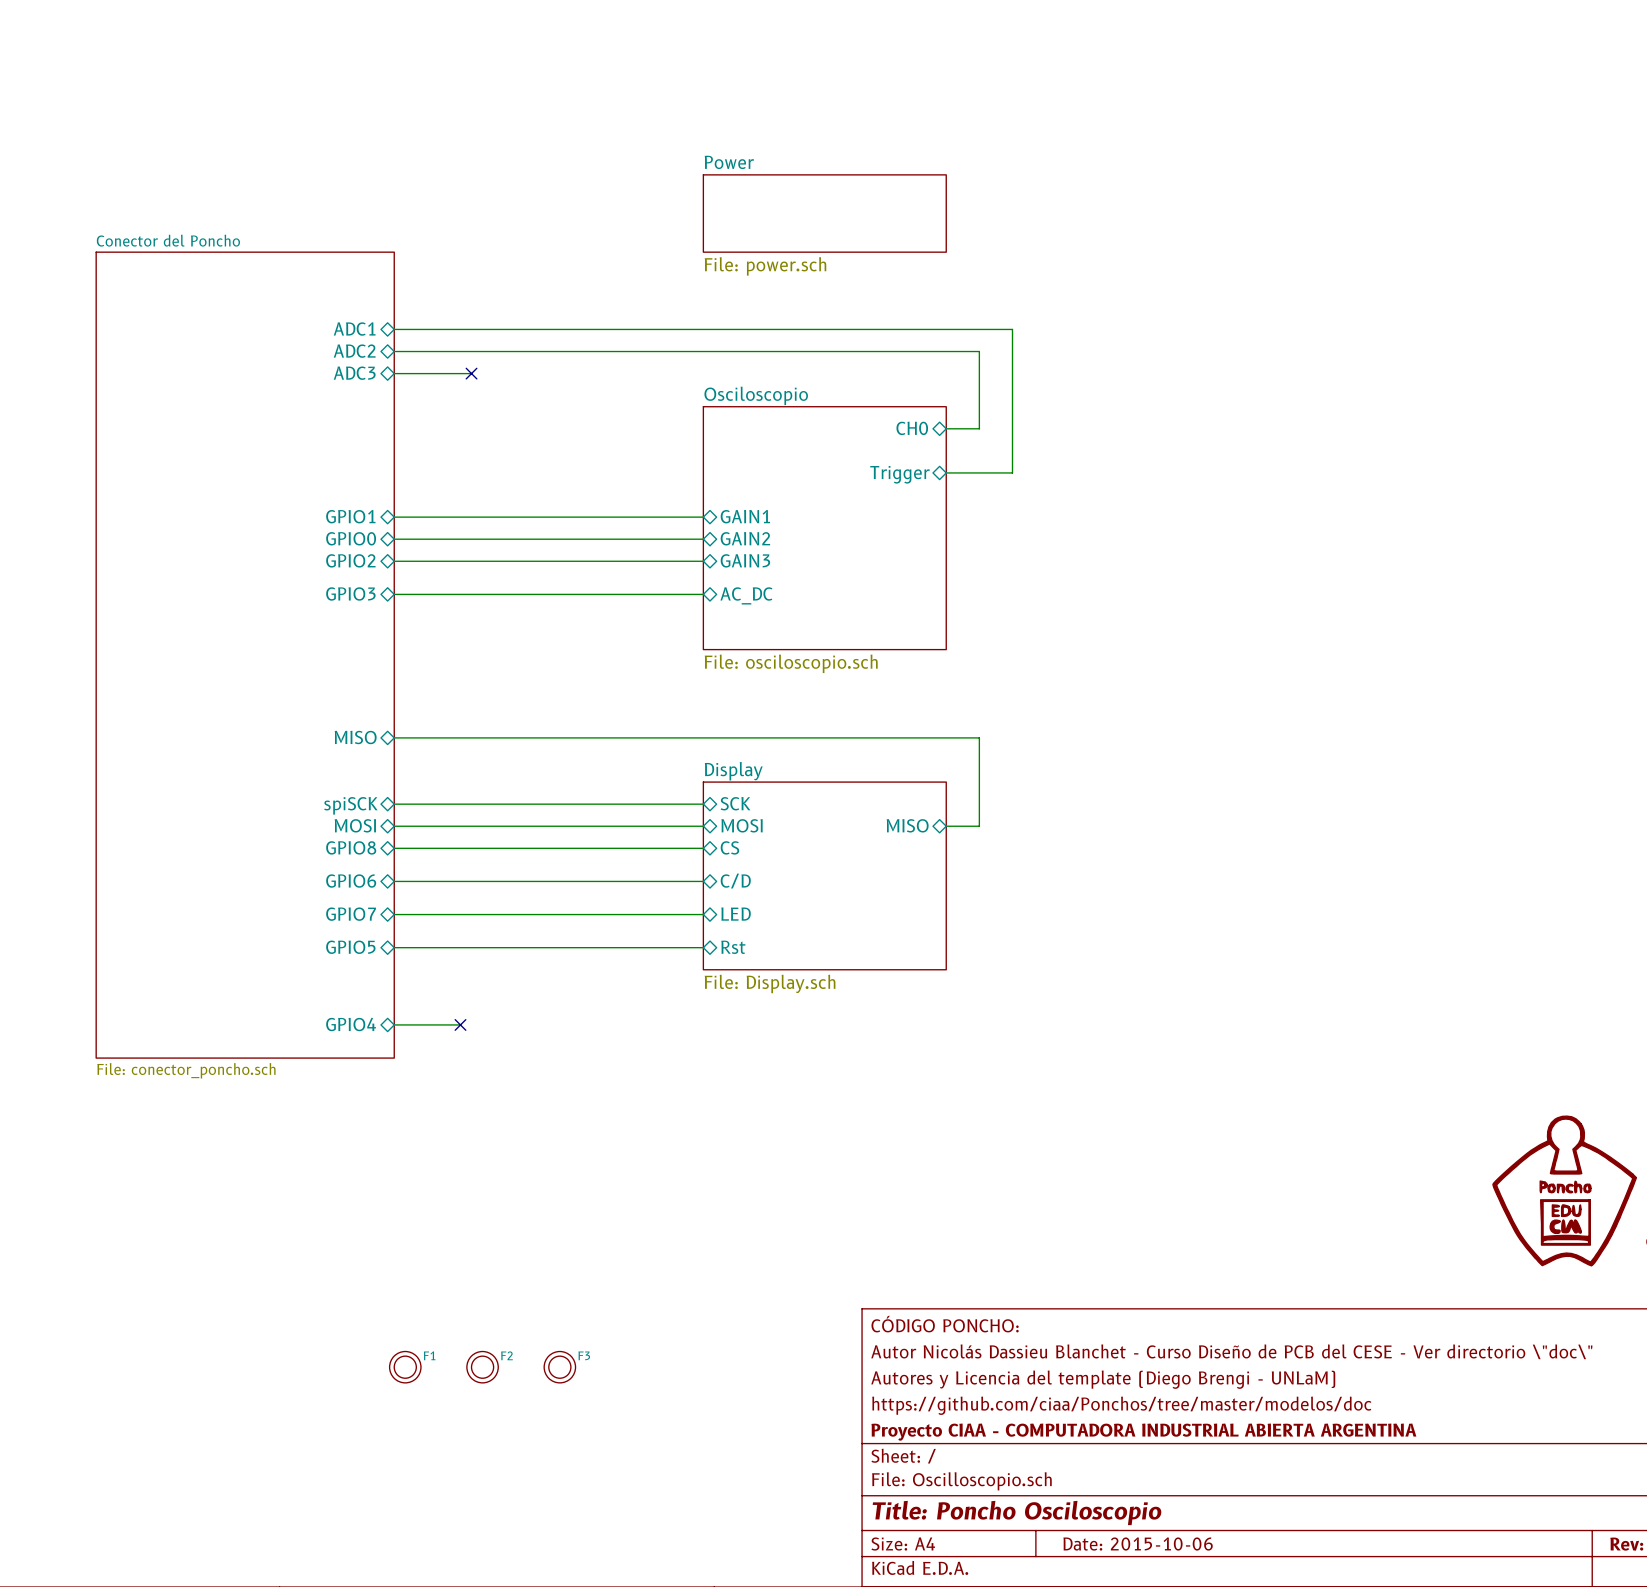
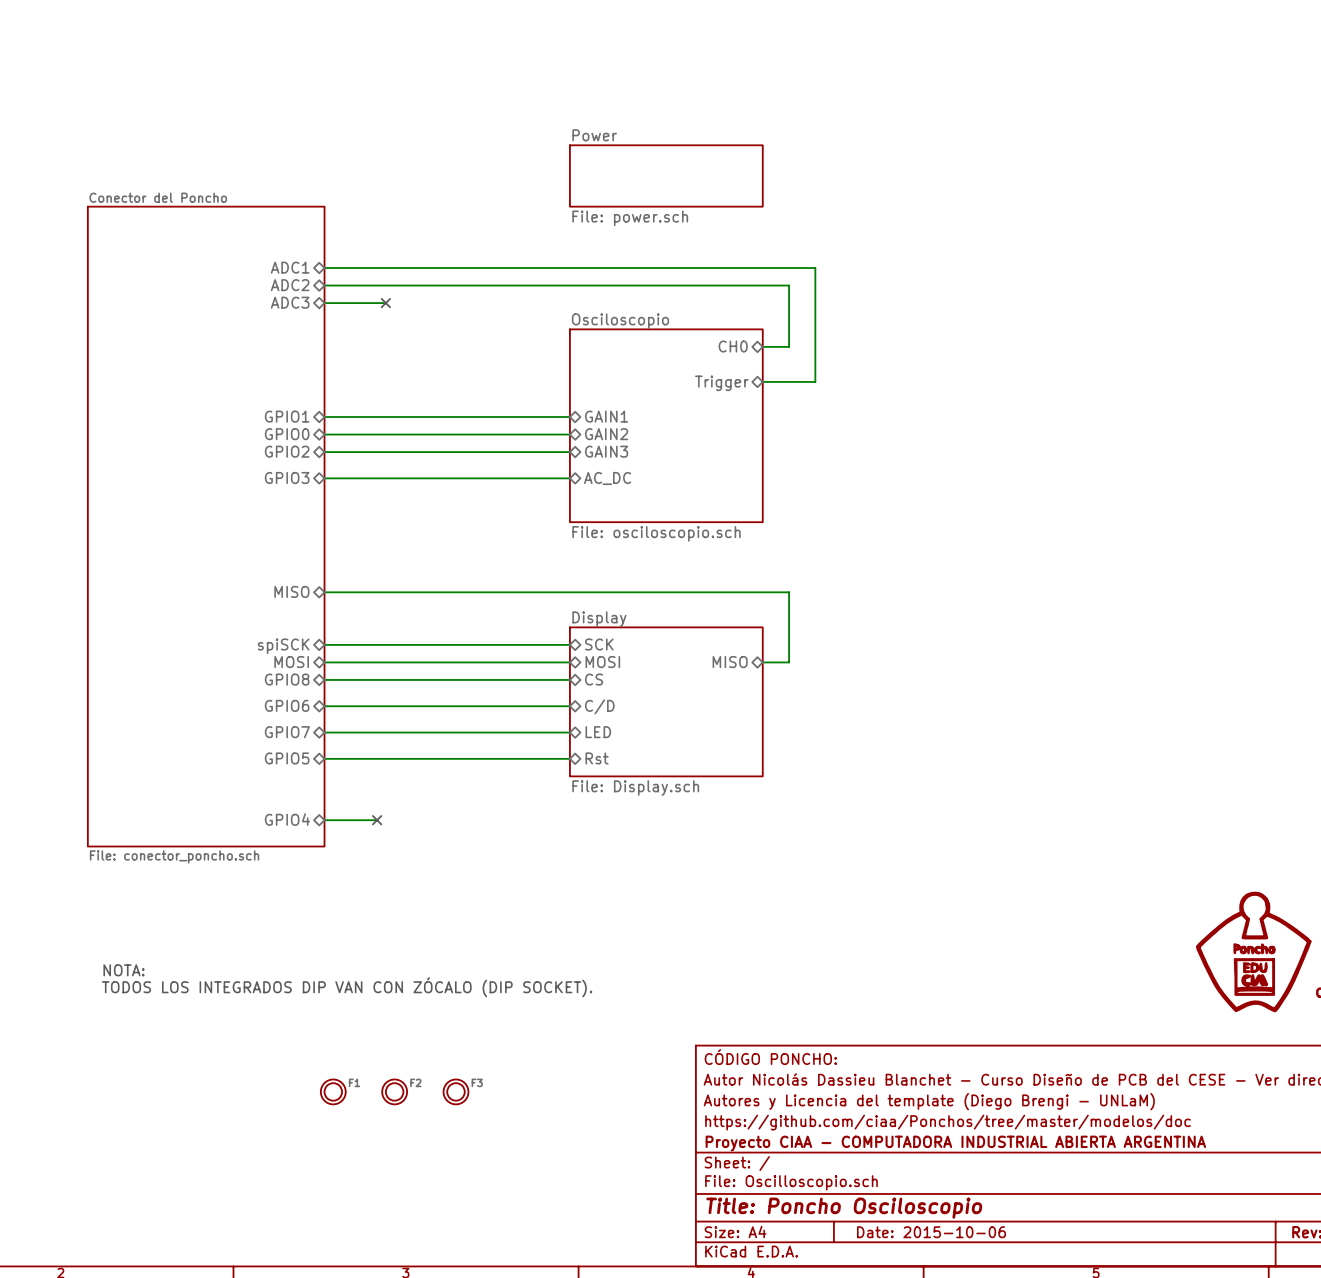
text: none -> NOTA: (123, 970)
text: none -> TODOS LOS INTEGRADOS DIP VAN CON ZÓCALO (DIP SOCKET). (347, 987)

